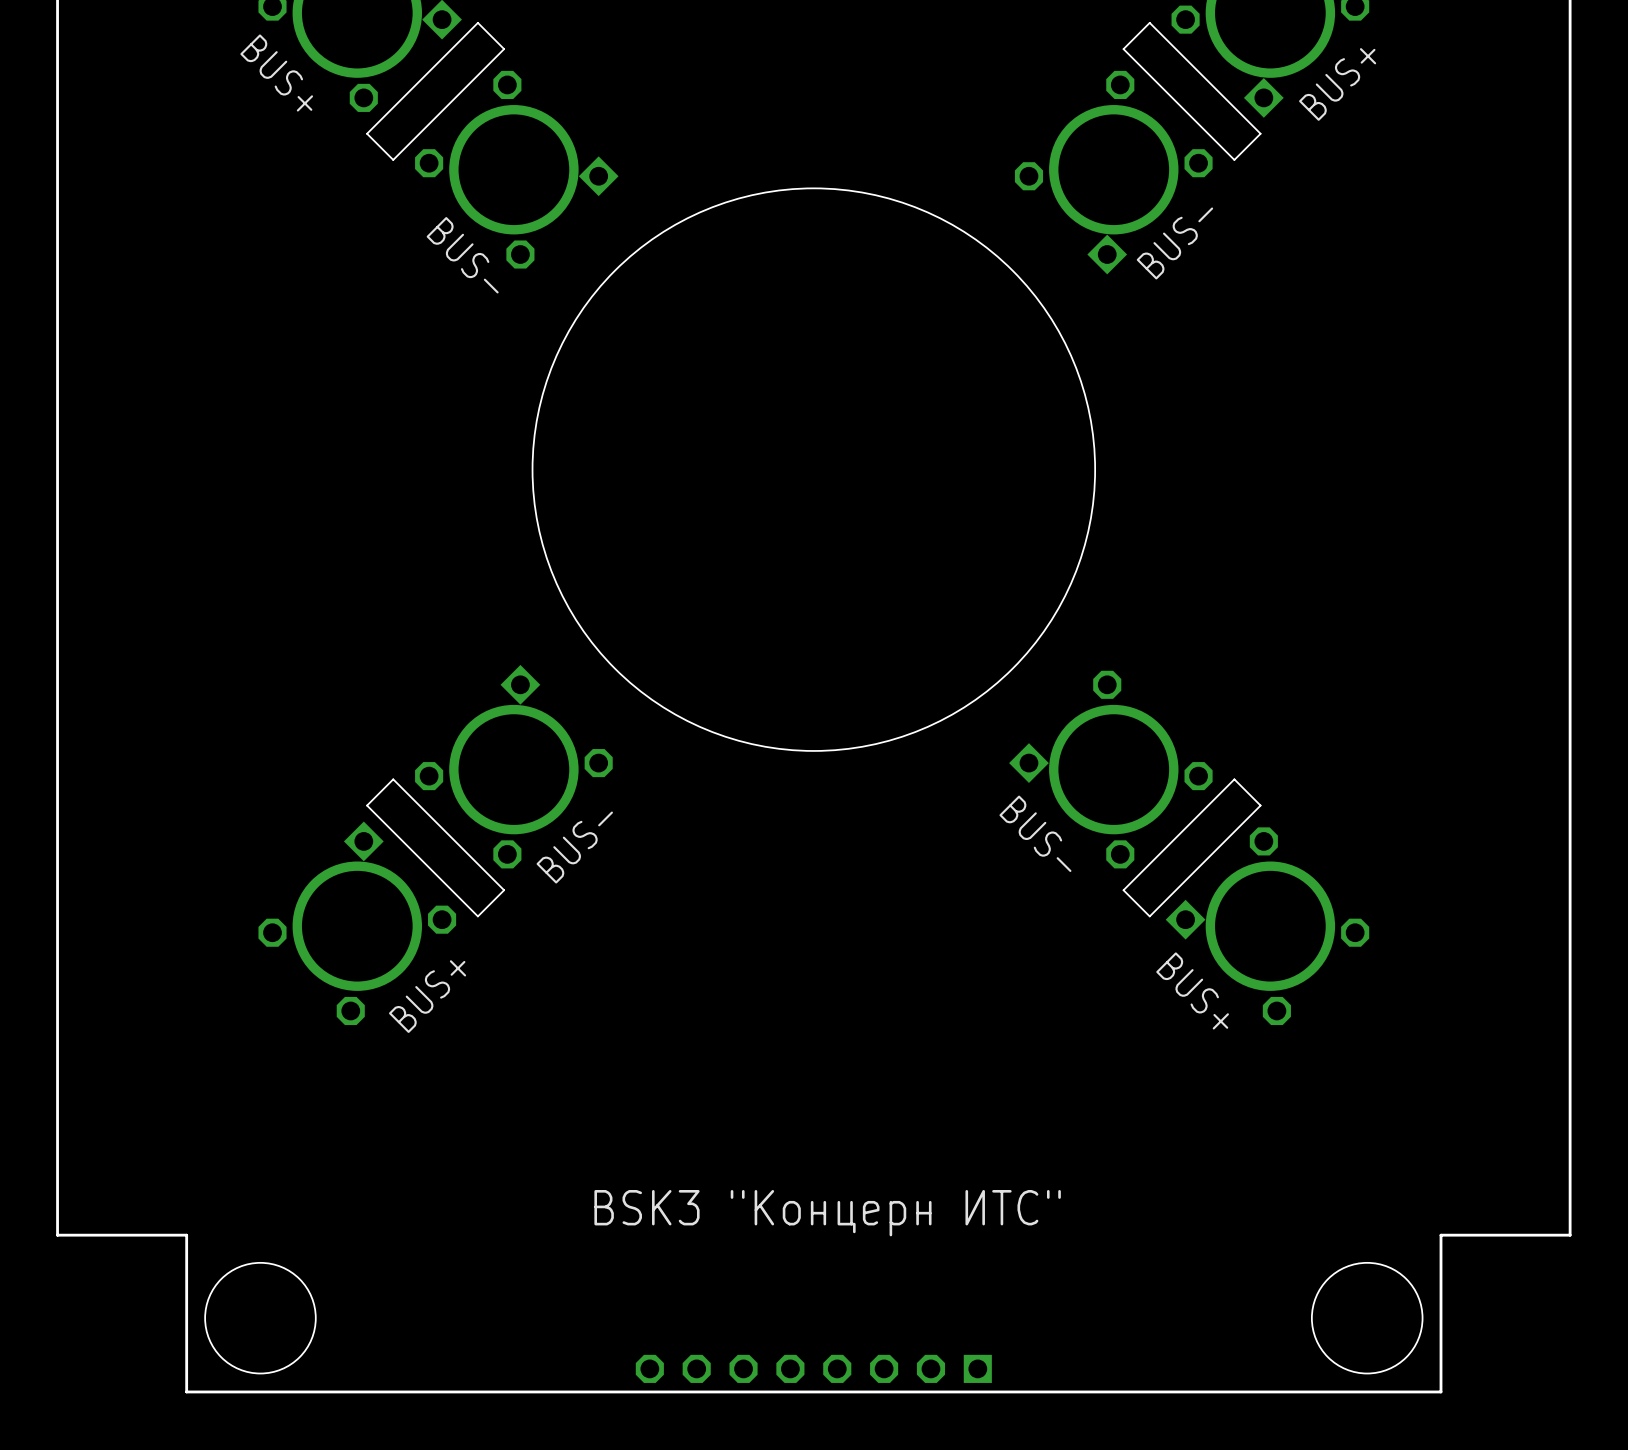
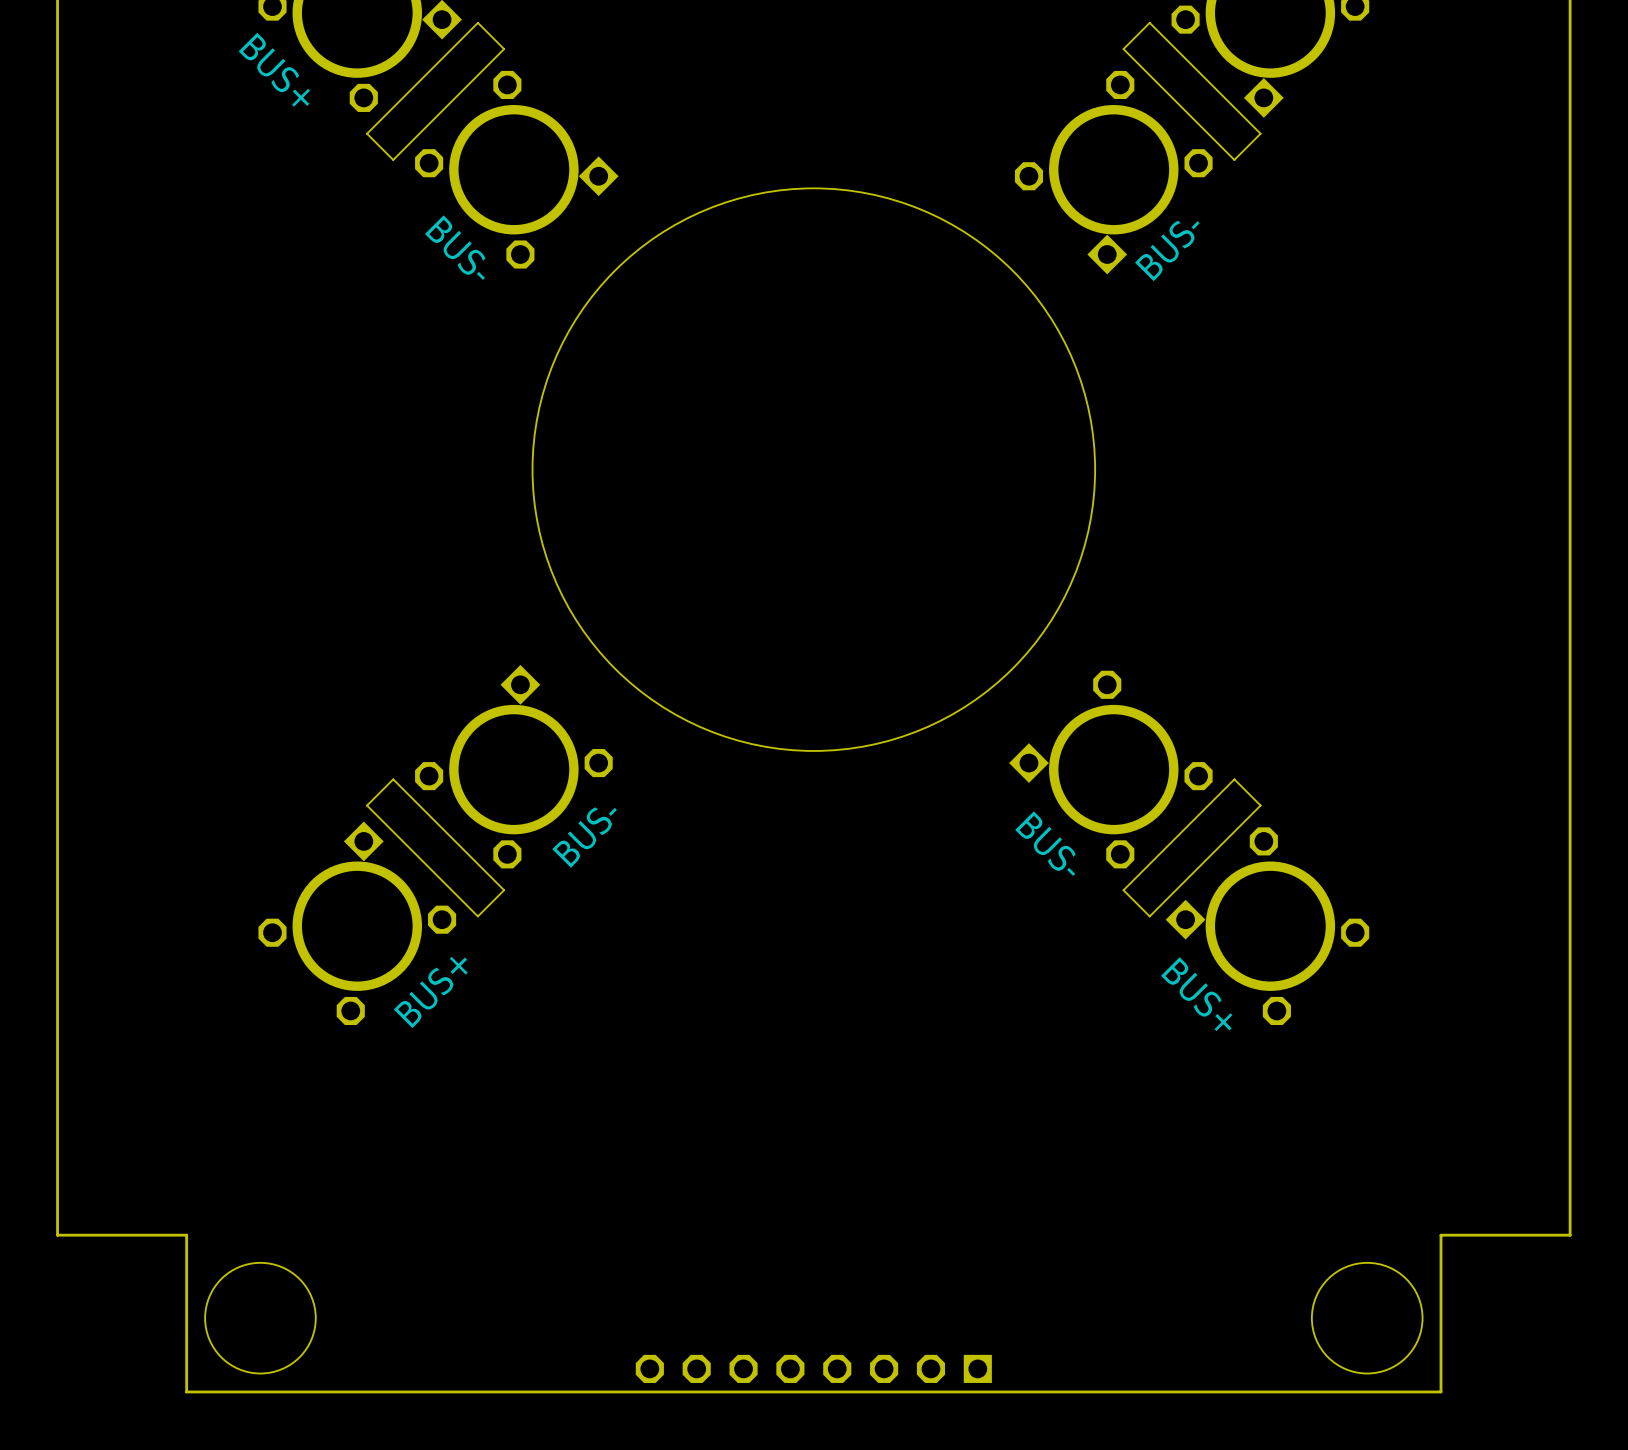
text: BUS+ (1337, 84) -> none
text: BSK3 "Концерн ИТС" (827, 1213) -> none

